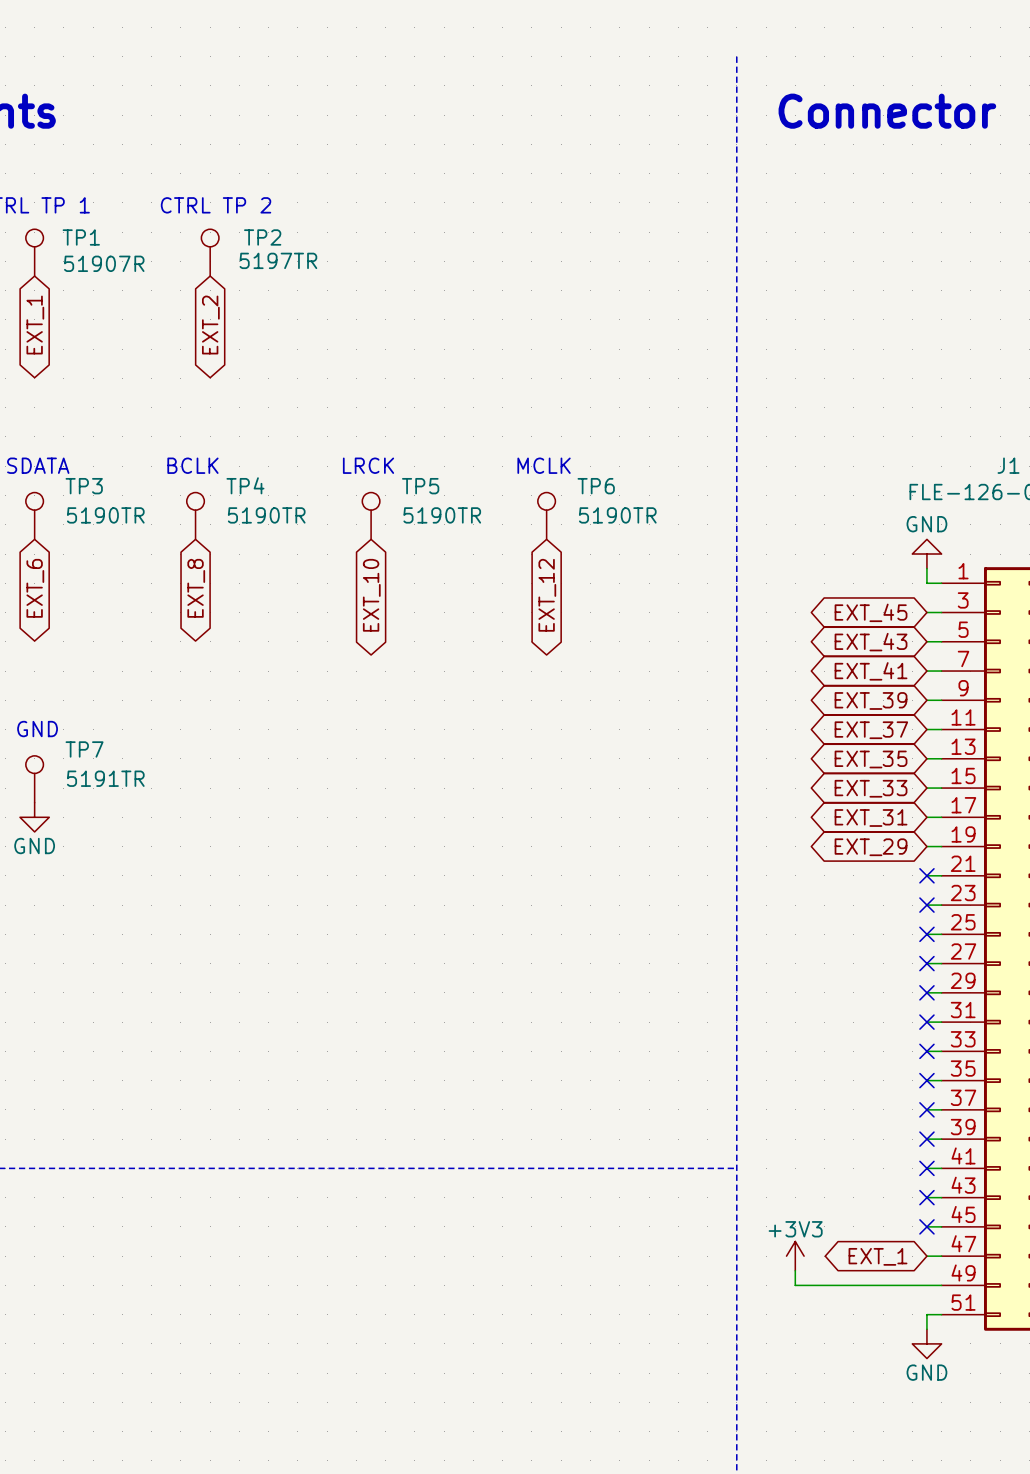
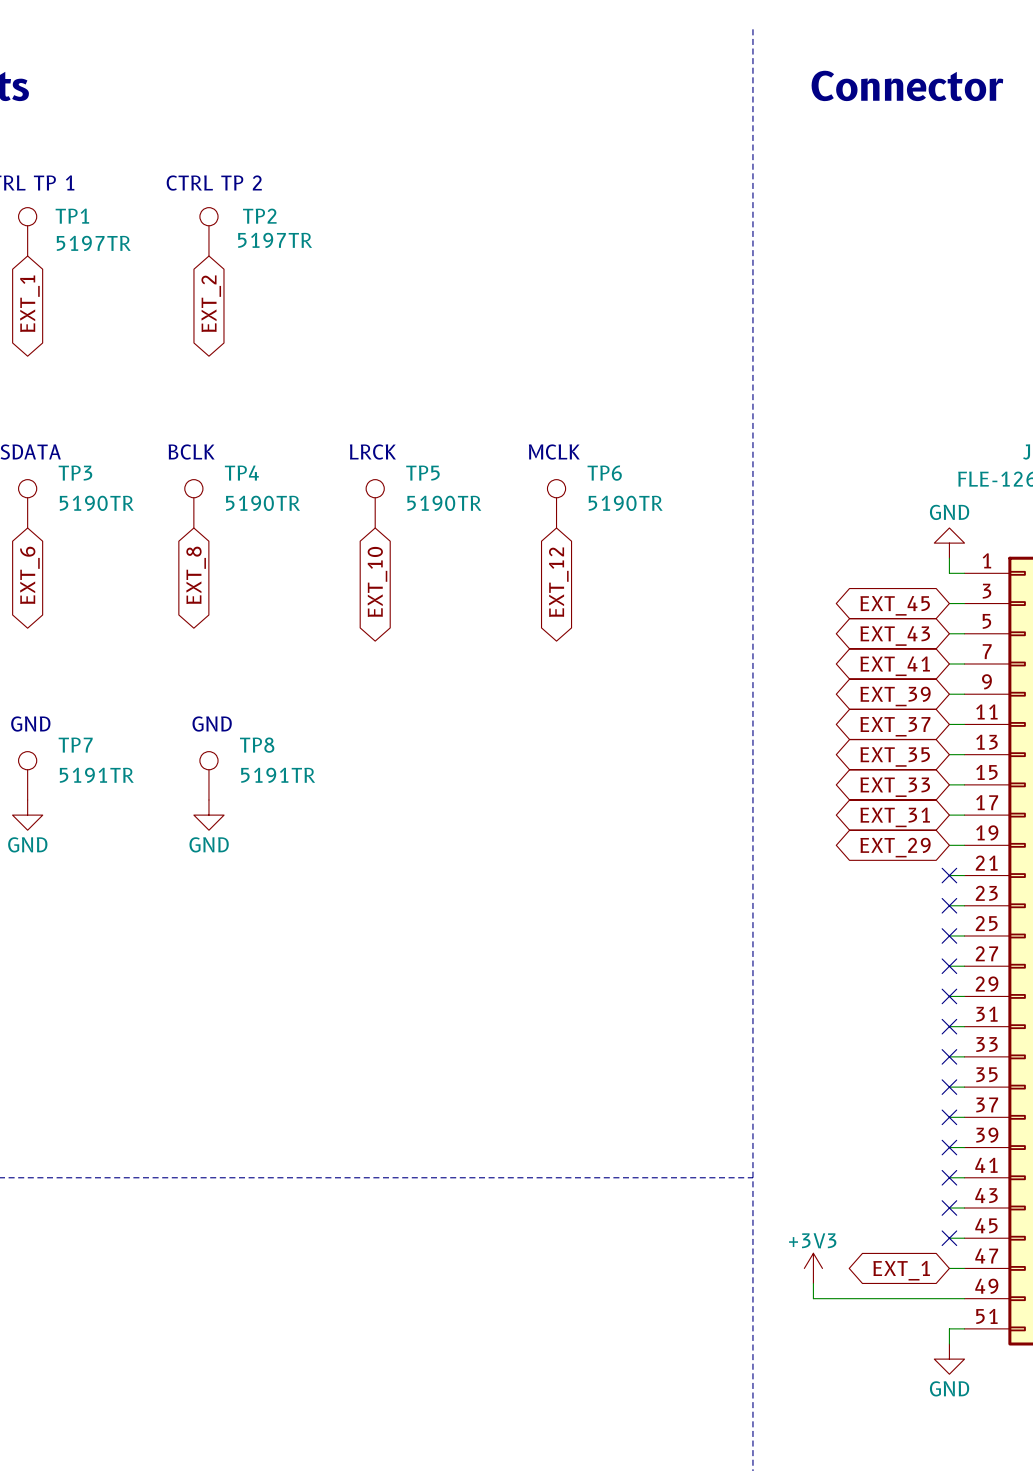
TP1 value: 51907R (104, 263) -> 5197TR (93, 243)
text: none -> GND (212, 724)
TP8: none -> 5191TR (208, 775)
power symbol: none -> GND (208, 815)

